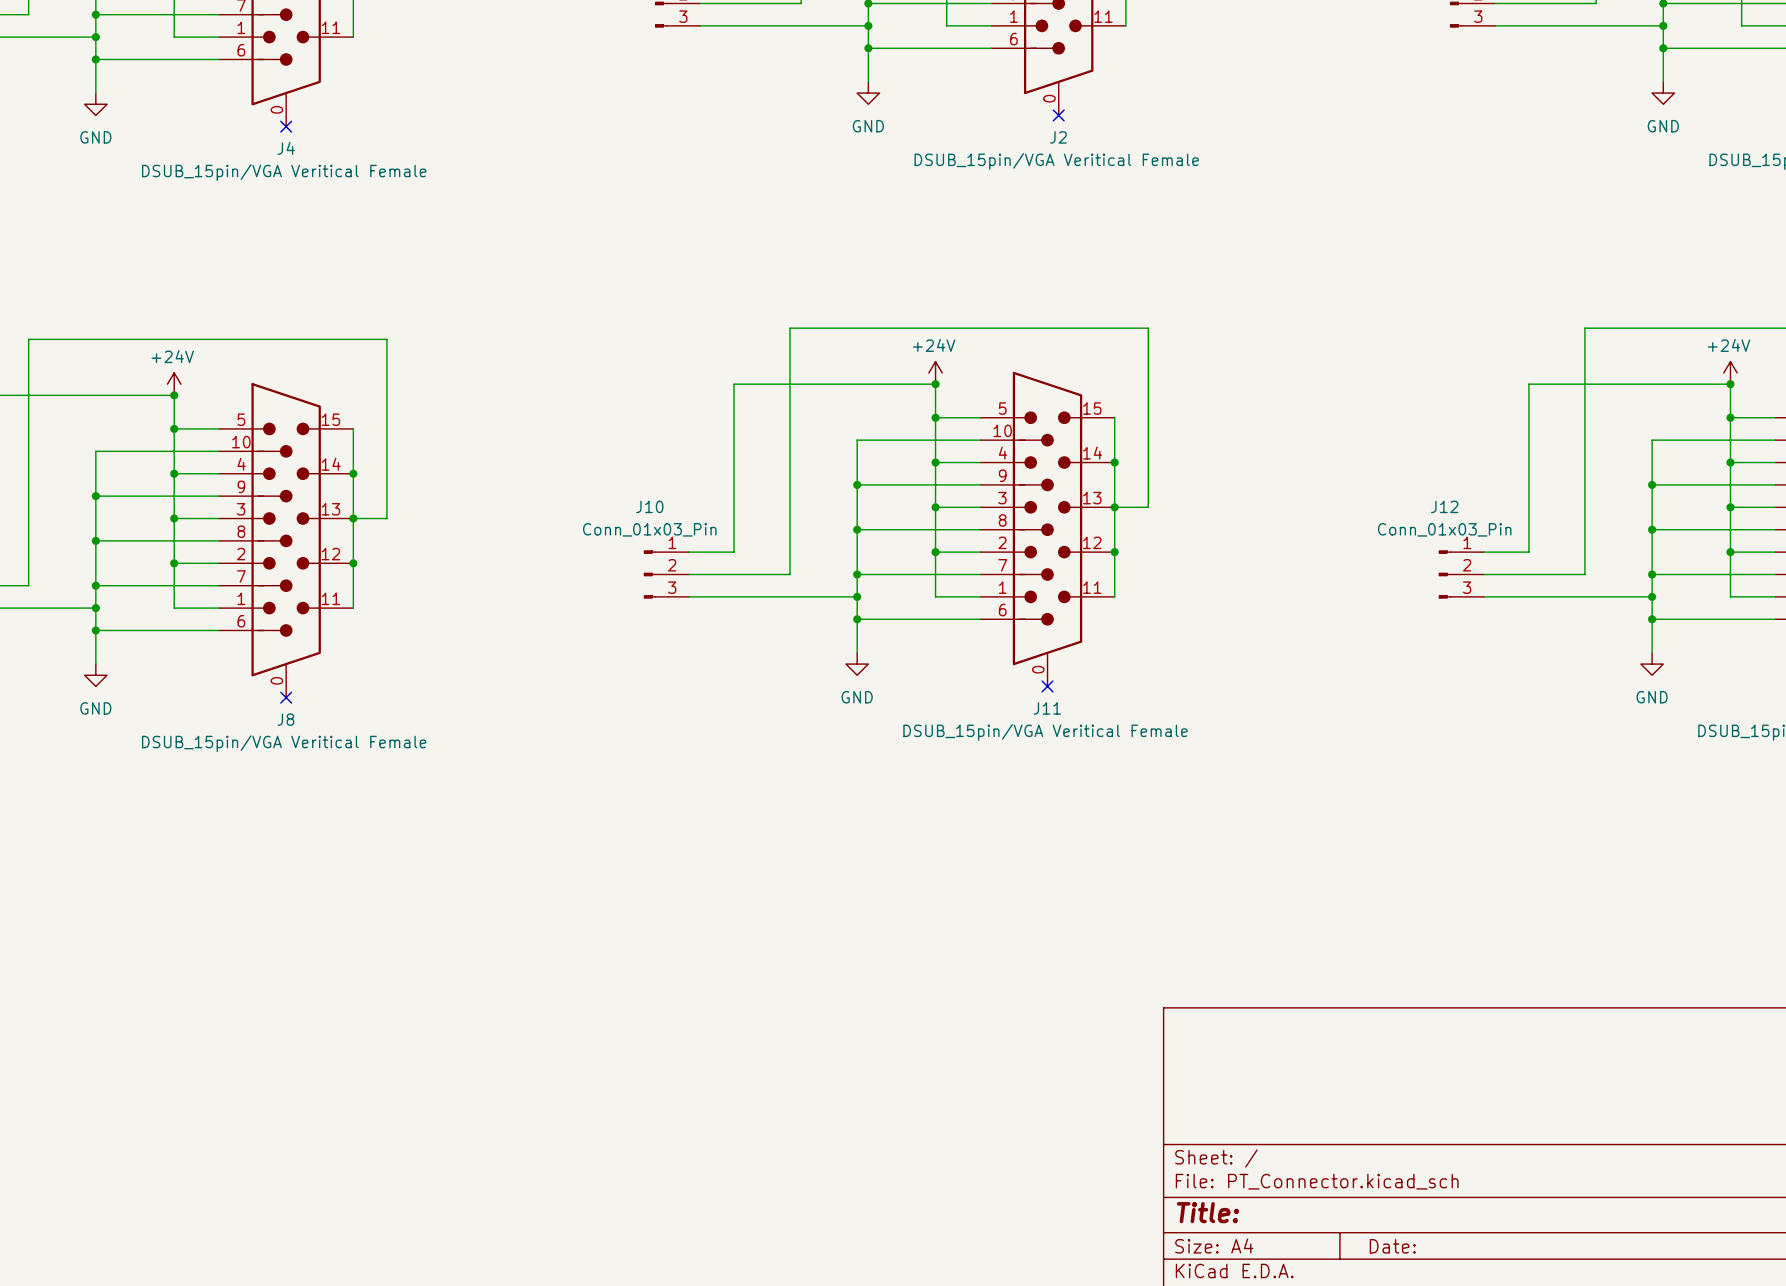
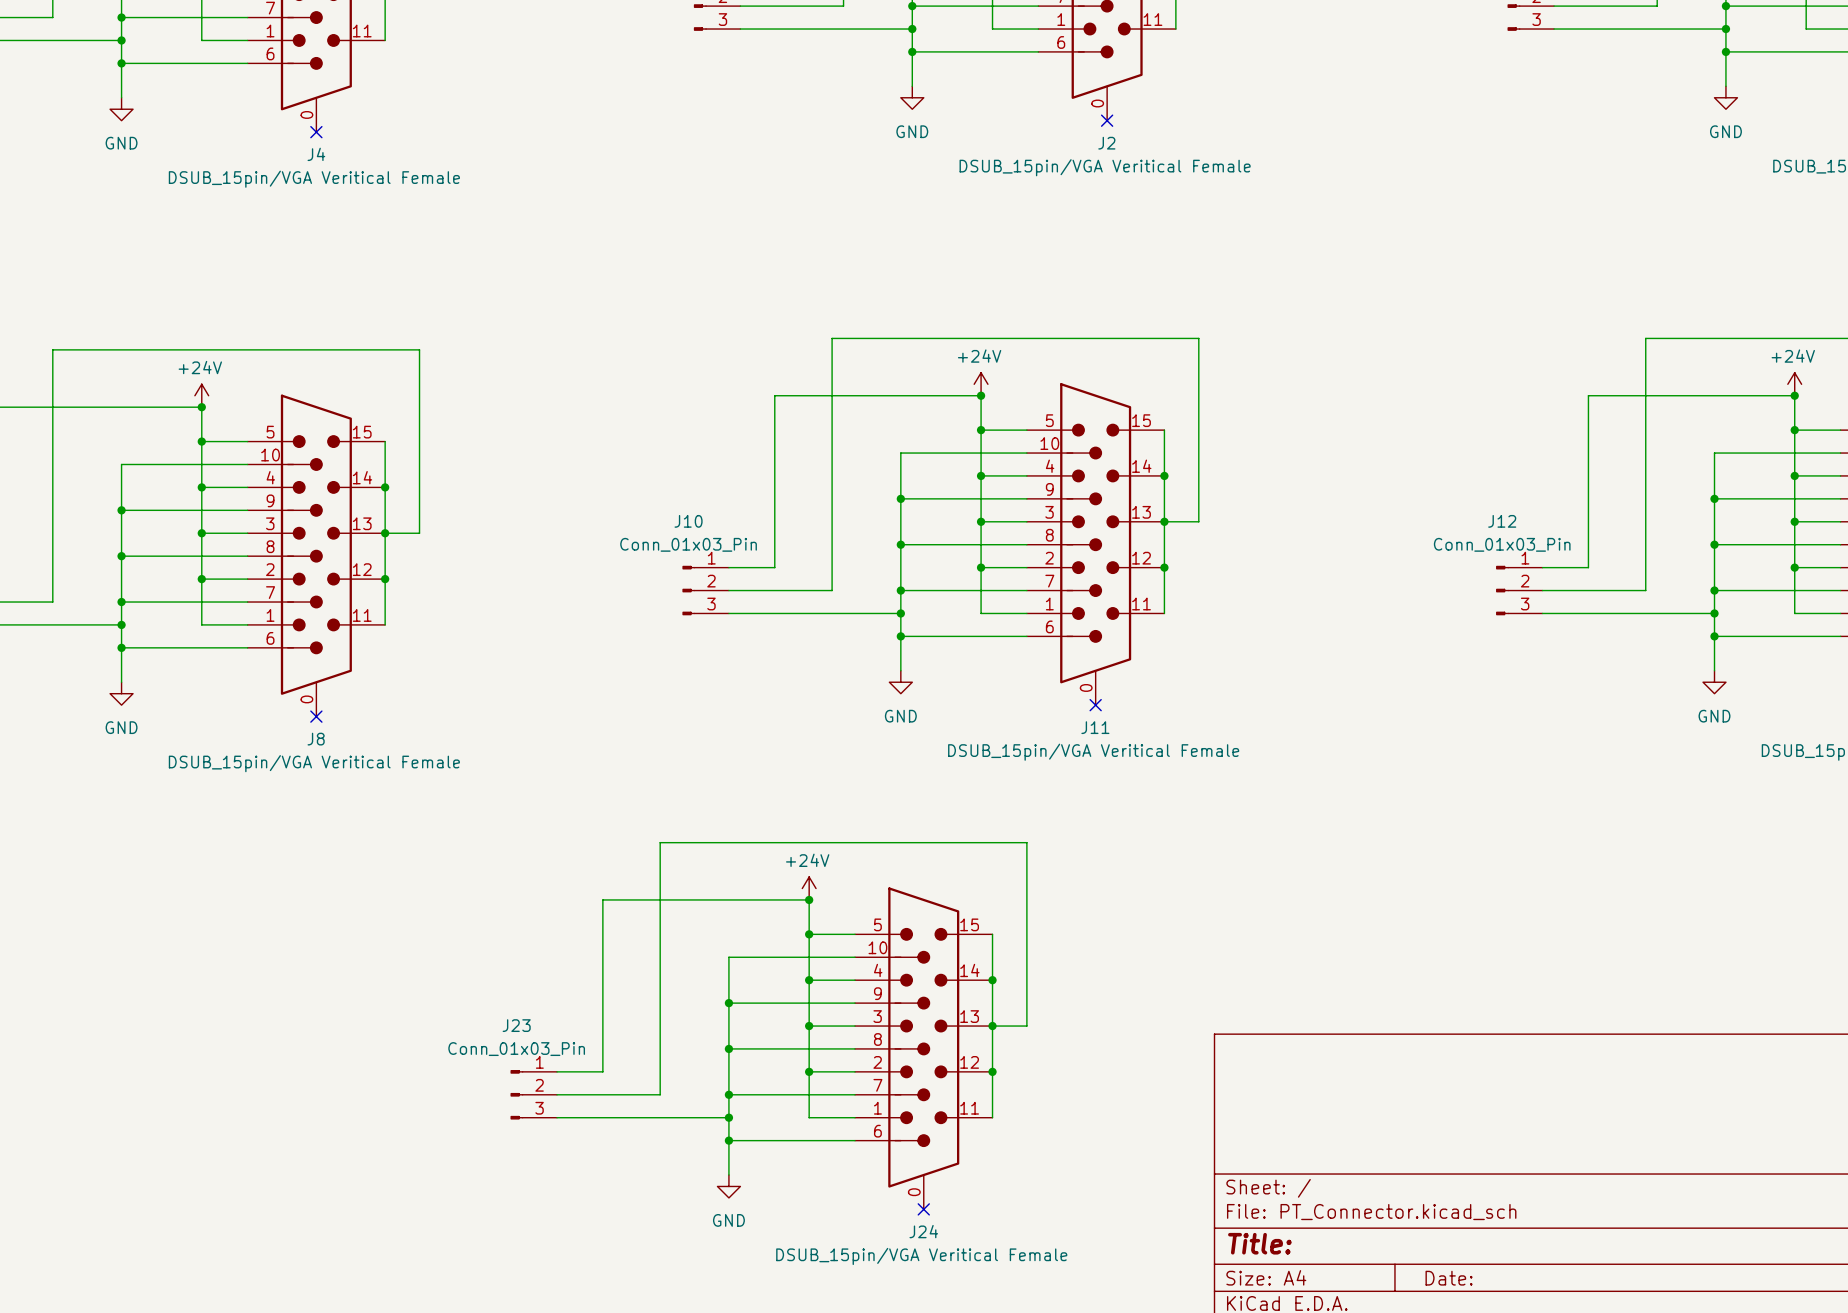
power symbol: none -> +24V (809, 888)
junction: none -> (809, 899)
wire: none -> (809, 934) (855, 934)
junction: none -> (809, 934)
wire: none -> (992, 934) (992, 1117)
wire: none -> (855, 957) (728, 957) (728, 1175)
wire: none -> (809, 980) (855, 980)
junction: none -> (809, 980)
junction: none -> (992, 980)
wire: none -> (728, 1003) (855, 1003)
junction: none -> (728, 1003)
wire: none -> (809, 1026) (855, 1026)
junction: none -> (809, 1026)
wire: none -> (992, 1026) (1026, 1026) (1026, 842) (660, 842) (660, 1094) (557, 1094)
junction: none -> (992, 1026)
J24: none -> DSUB_15pin/VGA Veritical Female (923, 1048)
wire: none -> (728, 1048) (855, 1048)
junction: none -> (728, 1048)
wire: none -> (557, 1071) (602, 1071) (602, 899) (809, 899) (809, 1117) (855, 1117)
wire: none -> (809, 1071) (855, 1071)
junction: none -> (809, 1071)
junction: none -> (992, 1071)
J23: none -> Conn_01x03_Pin (533, 1094)
wire: none -> (728, 1094) (855, 1094)
junction: none -> (728, 1094)
wire: none -> (557, 1117) (728, 1117)
junction: none -> (728, 1117)
wire: none -> (728, 1140) (855, 1140)
junction: none -> (728, 1140)
power symbol: none -> GND (728, 1186)
no-connect mark: none -> (923, 1209)

